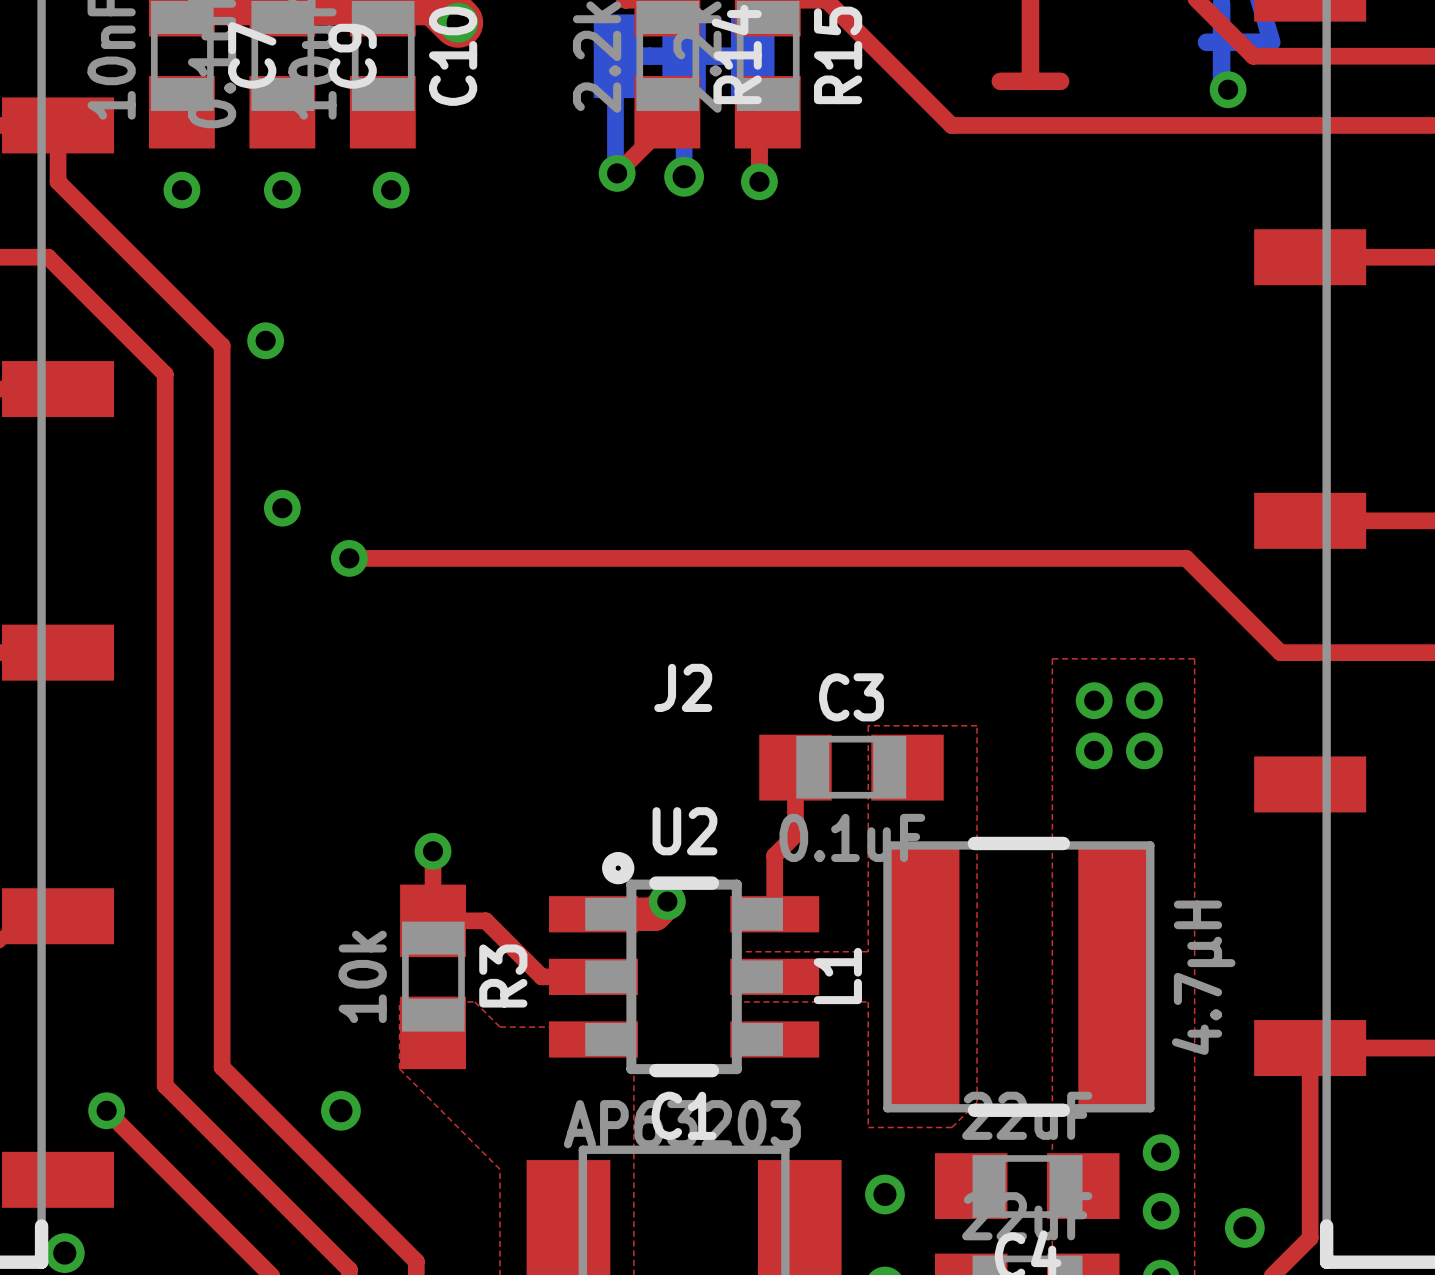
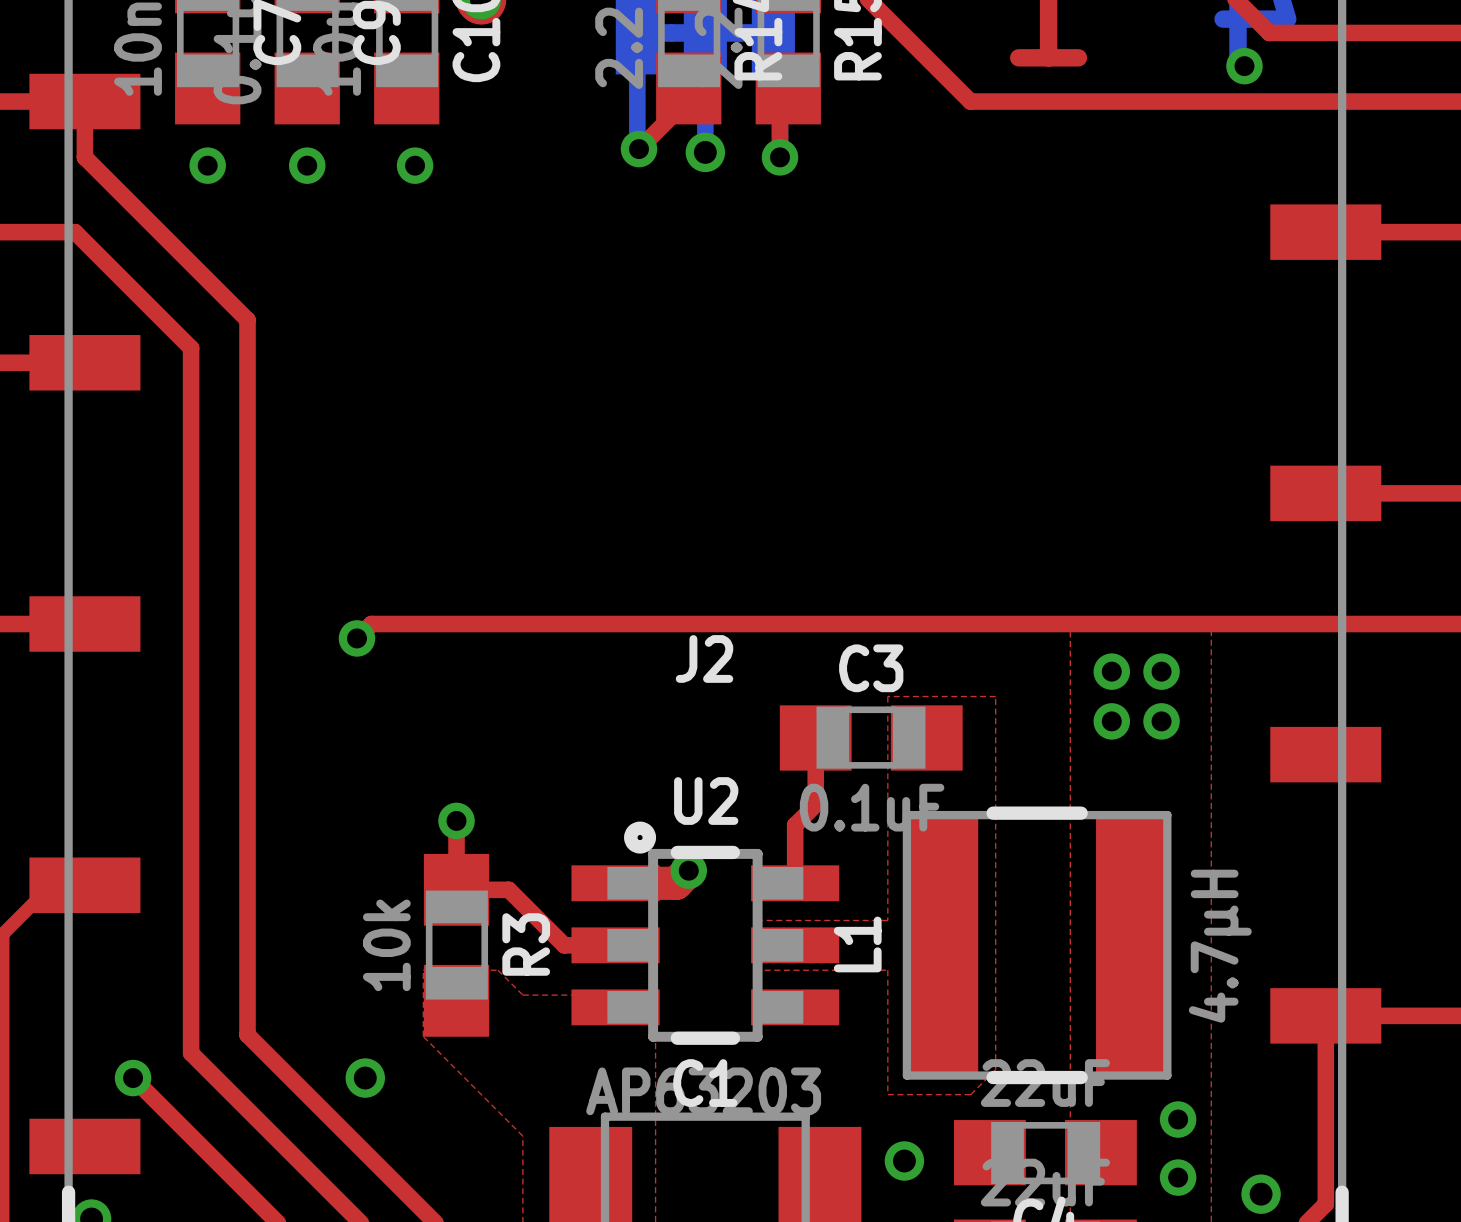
via: (265, 340) -> none
via: (282, 508) -> none
top track: (349, 558) (1186, 558) (1280, 652) -> (356, 638) (371, 624) (1296, 624)
via: (349, 558) -> none
via: none -> (356, 638)

